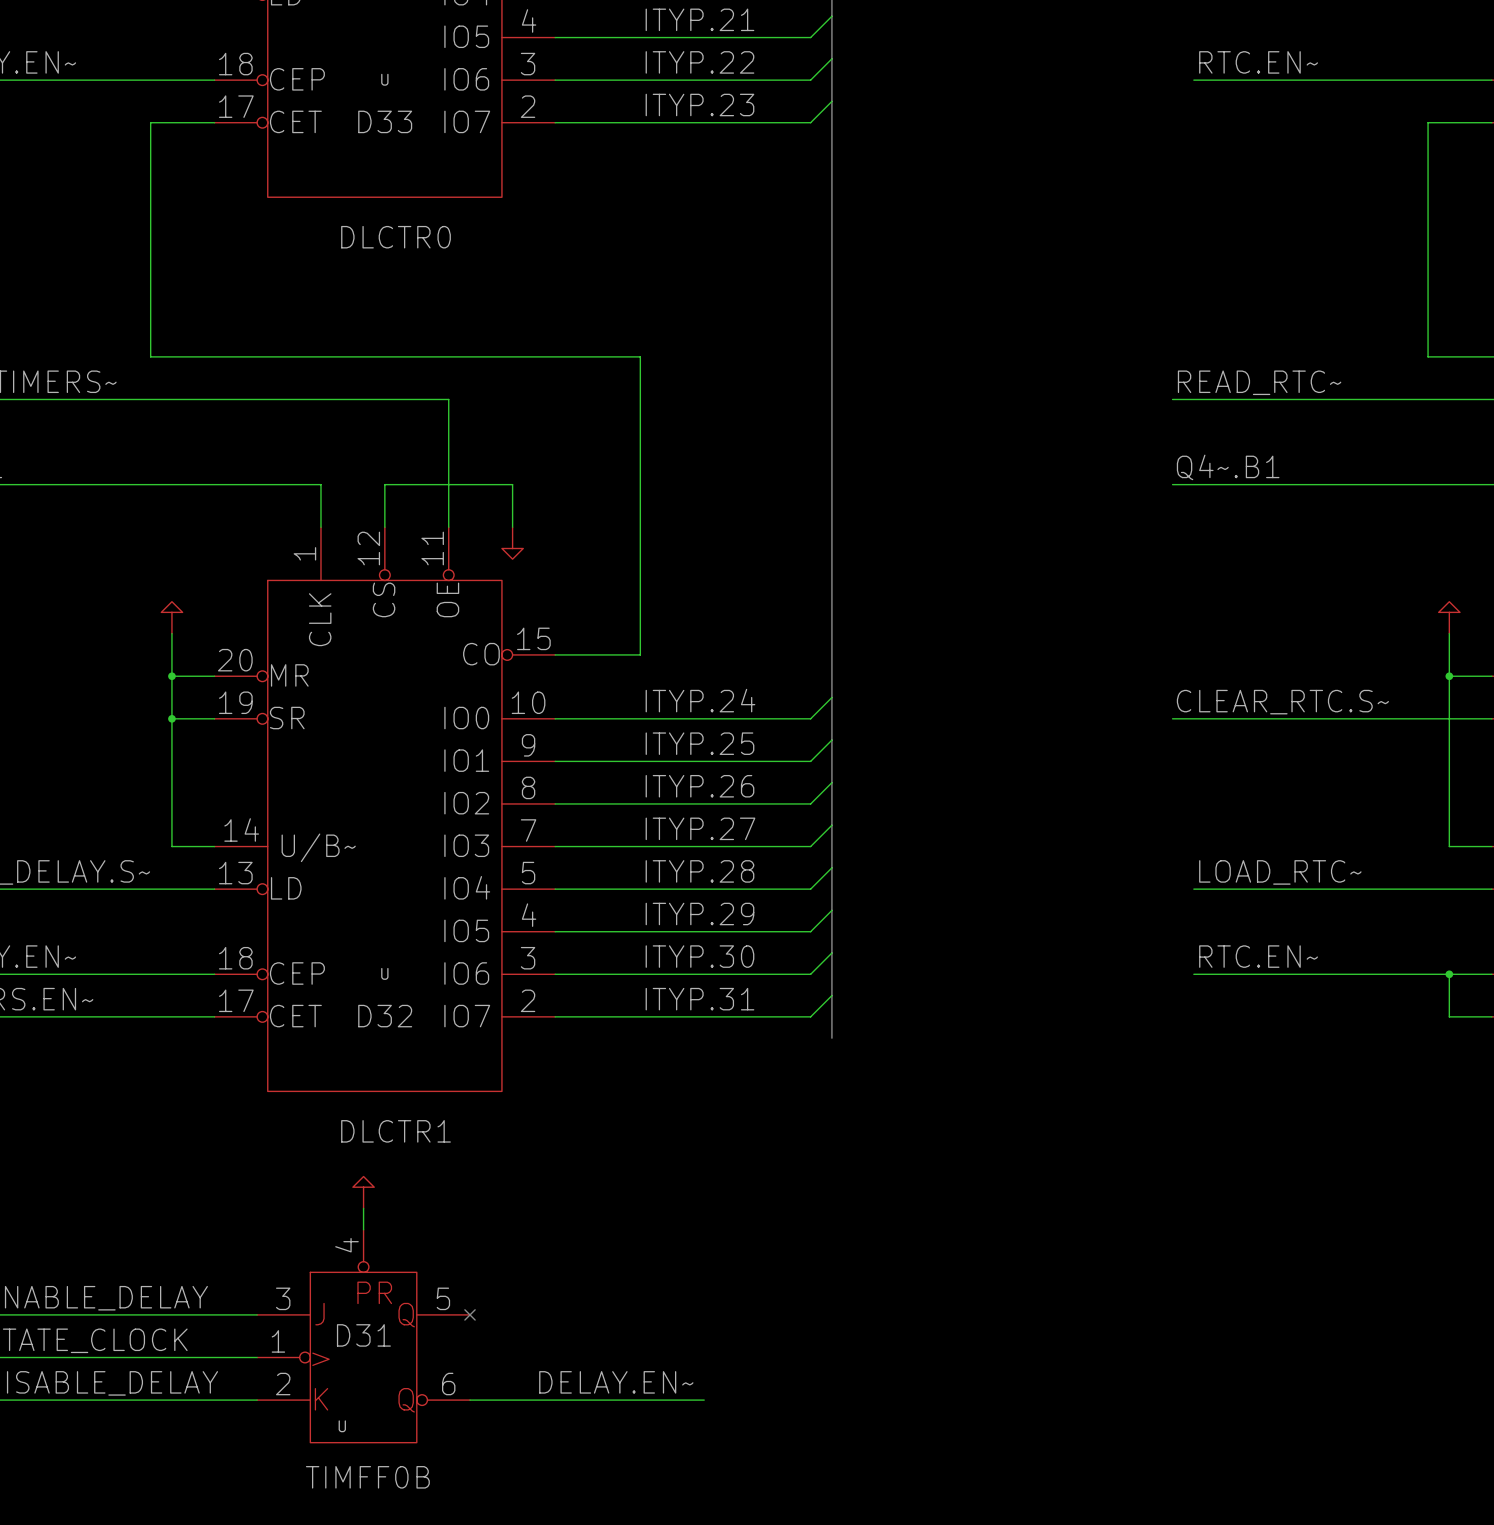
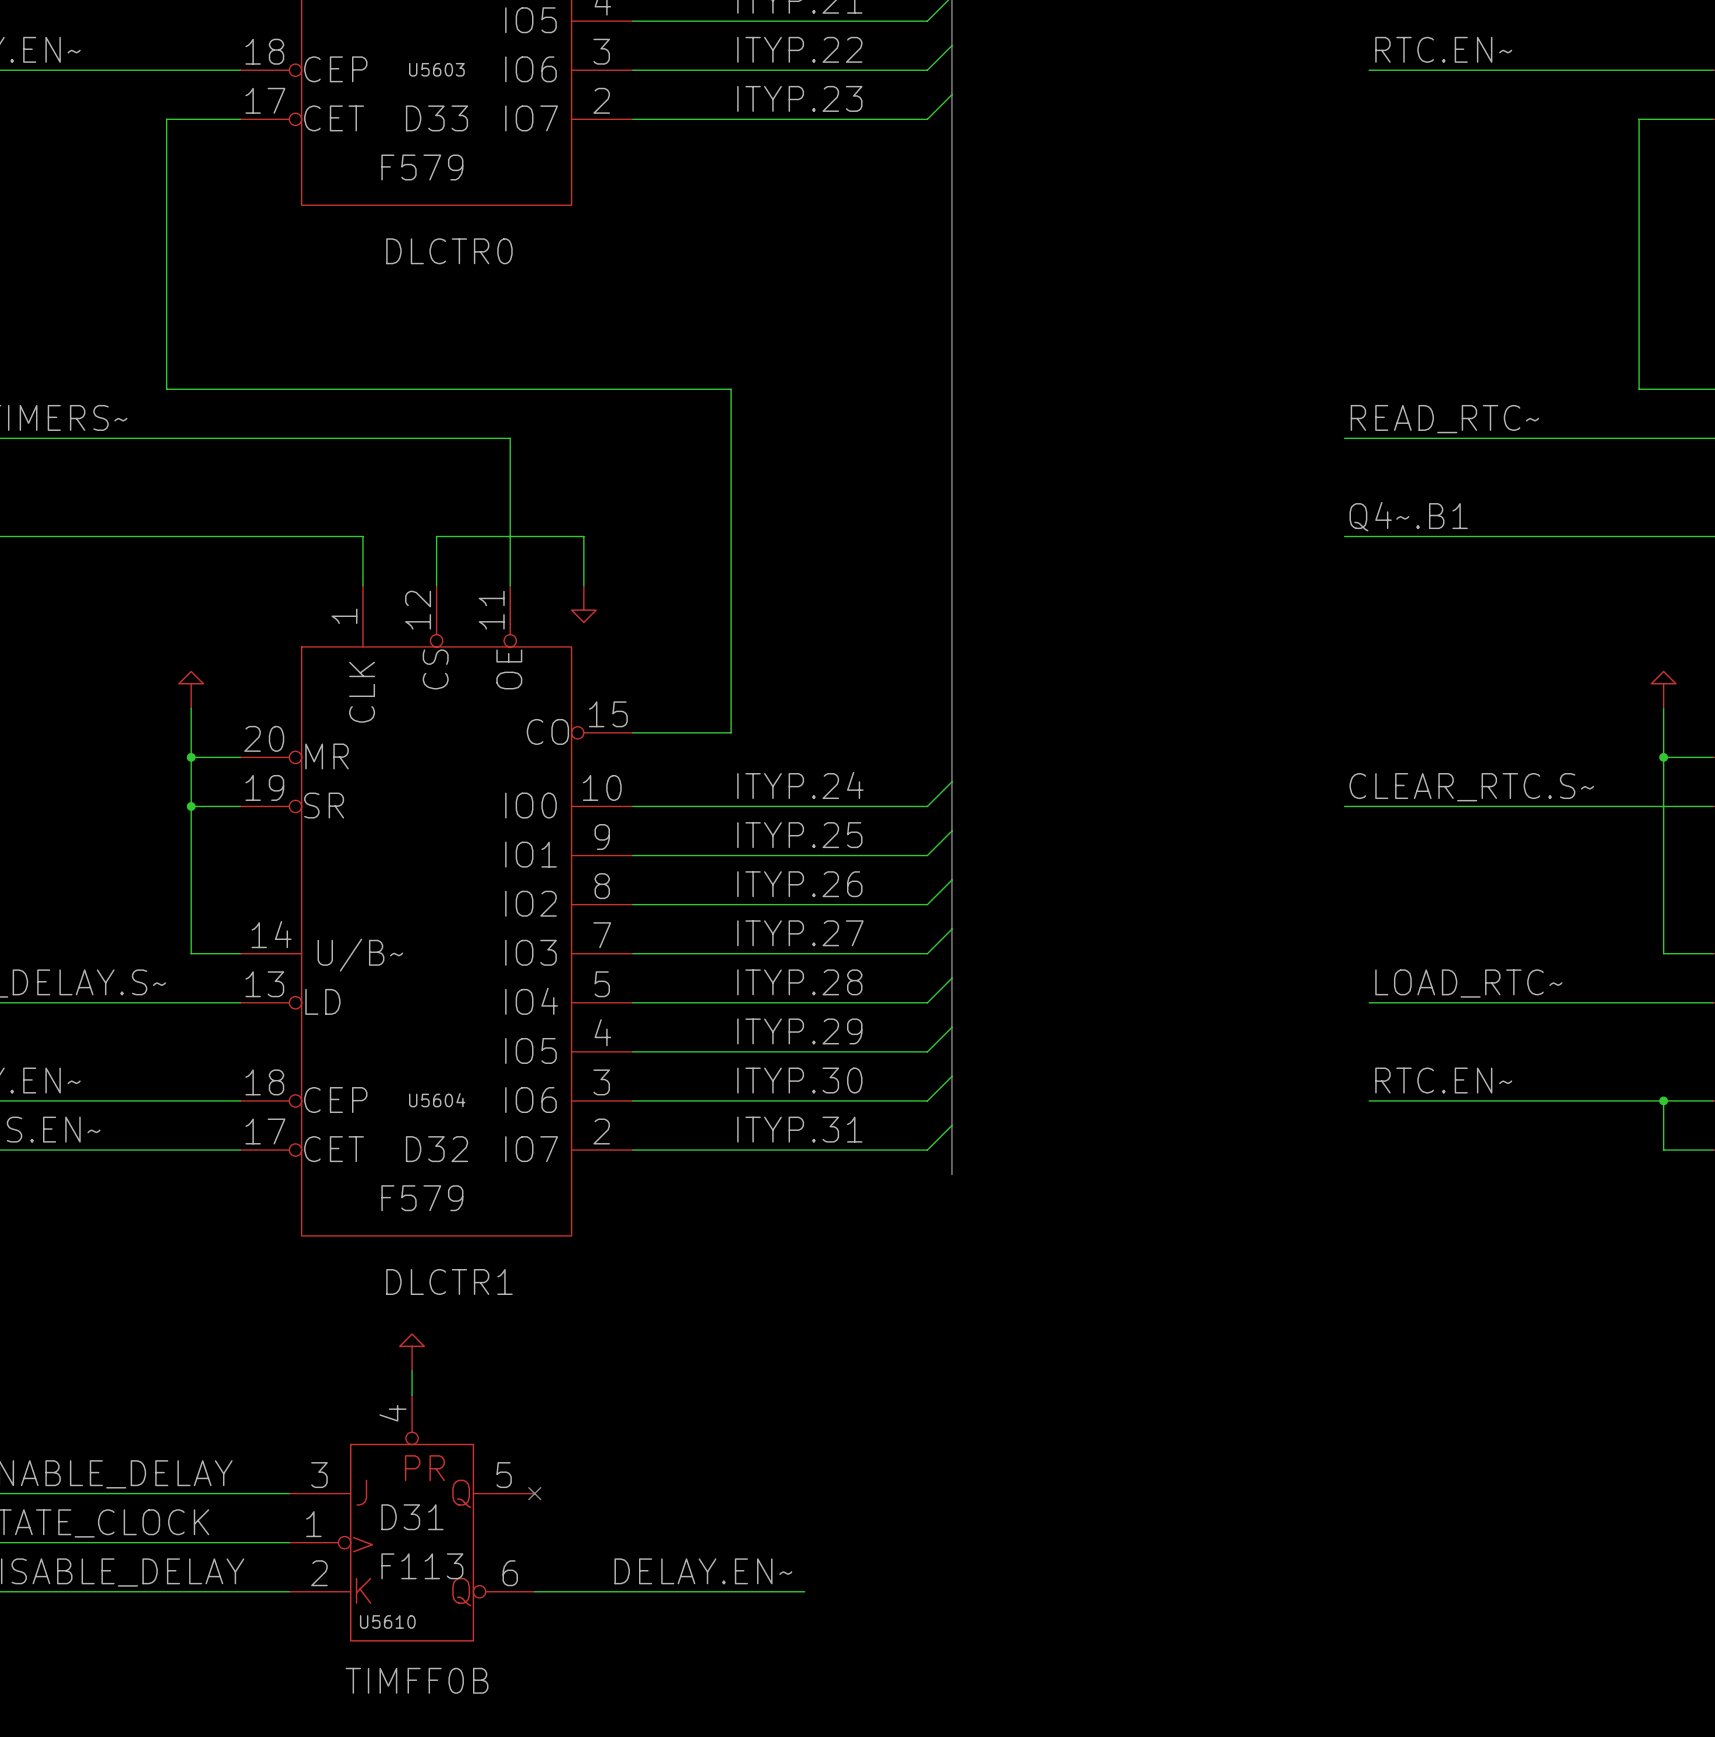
U name: U (384, 79) -> U5603 (436, 69)
U value: none -> F579 (422, 167)
U name: U (384, 973) -> U5604 (437, 1100)
U value: none -> F579 (422, 1198)
U value: none -> F113 (422, 1566)
U name: U (342, 1426) -> U5610 (387, 1621)

